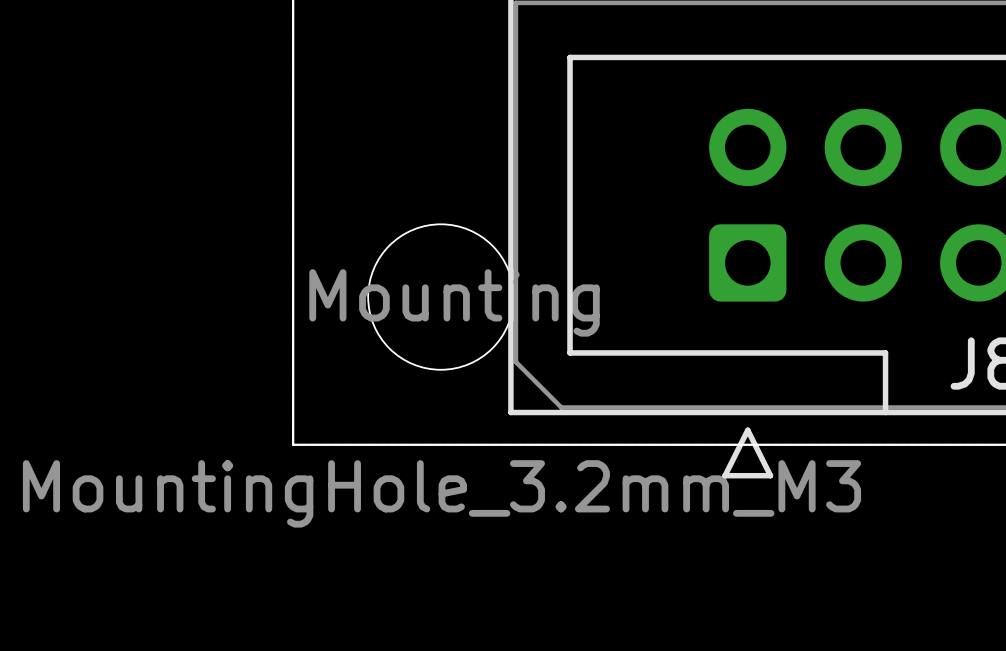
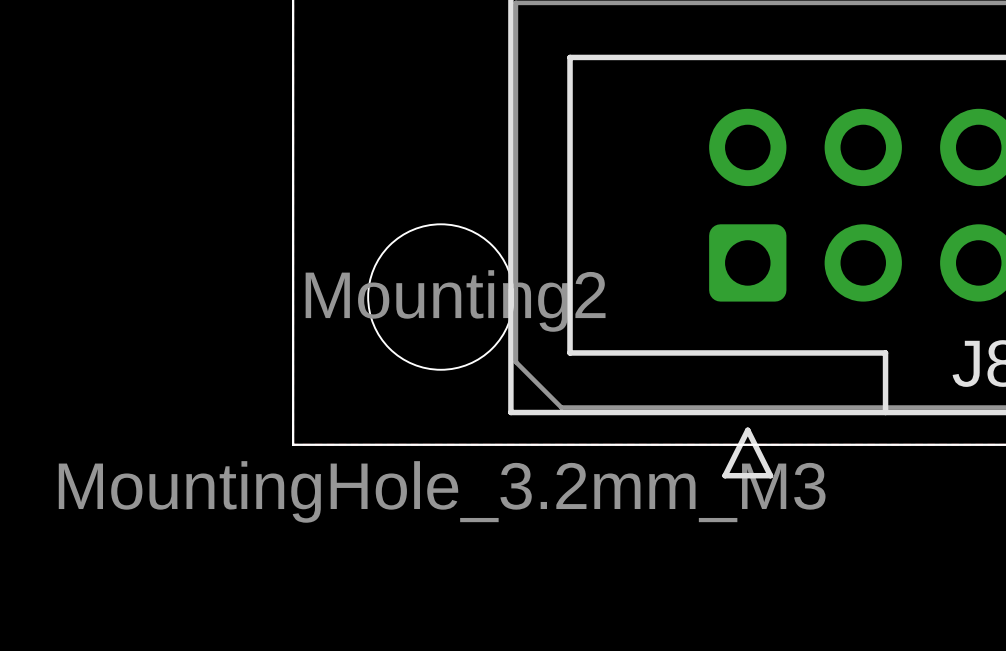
Mounting name: Mounting (454, 302) -> Mounting2 (455, 300)

